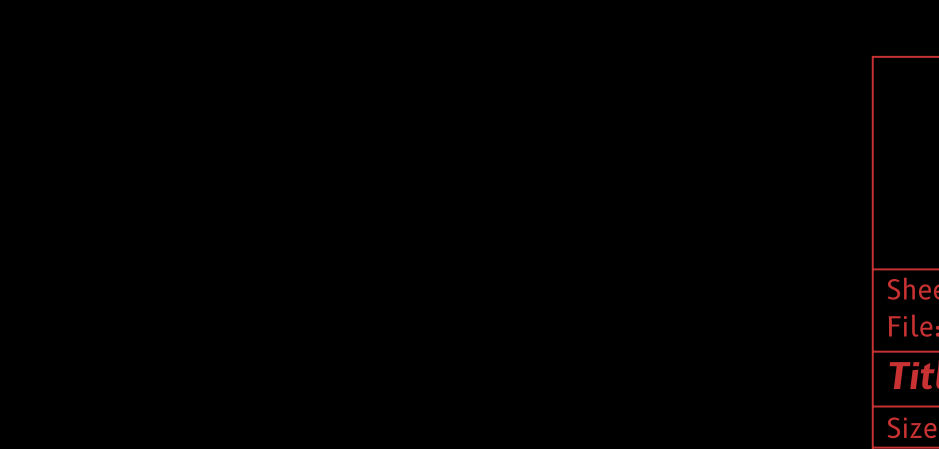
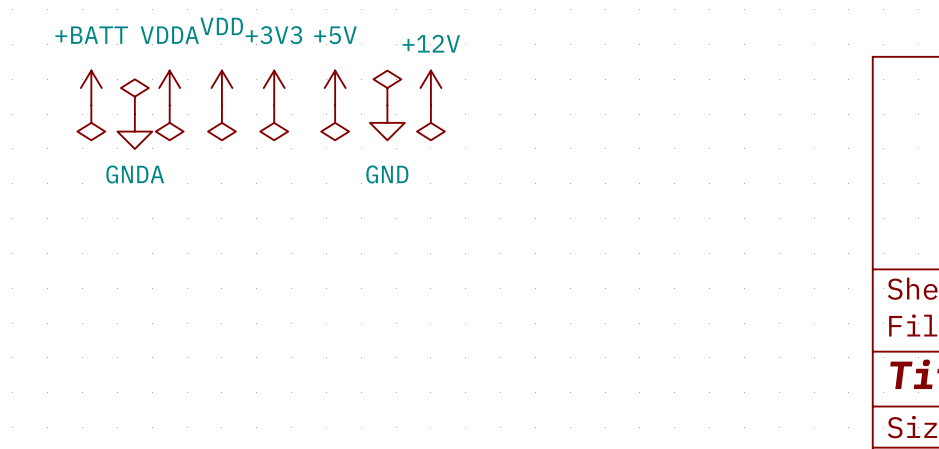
power symbol: none -> +BATT (91, 88)
power symbol: none -> VDDA (169, 88)
power symbol: none -> VDD (221, 88)
power symbol: none -> +3V3 (274, 88)
power symbol: none -> +5V (335, 88)
power symbol: none -> (387, 88)
power symbol: none -> +12V (430, 88)
power symbol: none -> (134, 96)
power symbol: none -> (91, 122)
power symbol: none -> (169, 122)
power symbol: none -> (221, 122)
power symbol: none -> (274, 122)
power symbol: none -> (335, 122)
power symbol: none -> GND (387, 122)
power symbol: none -> (430, 122)
power symbol: none -> GNDA (134, 131)

